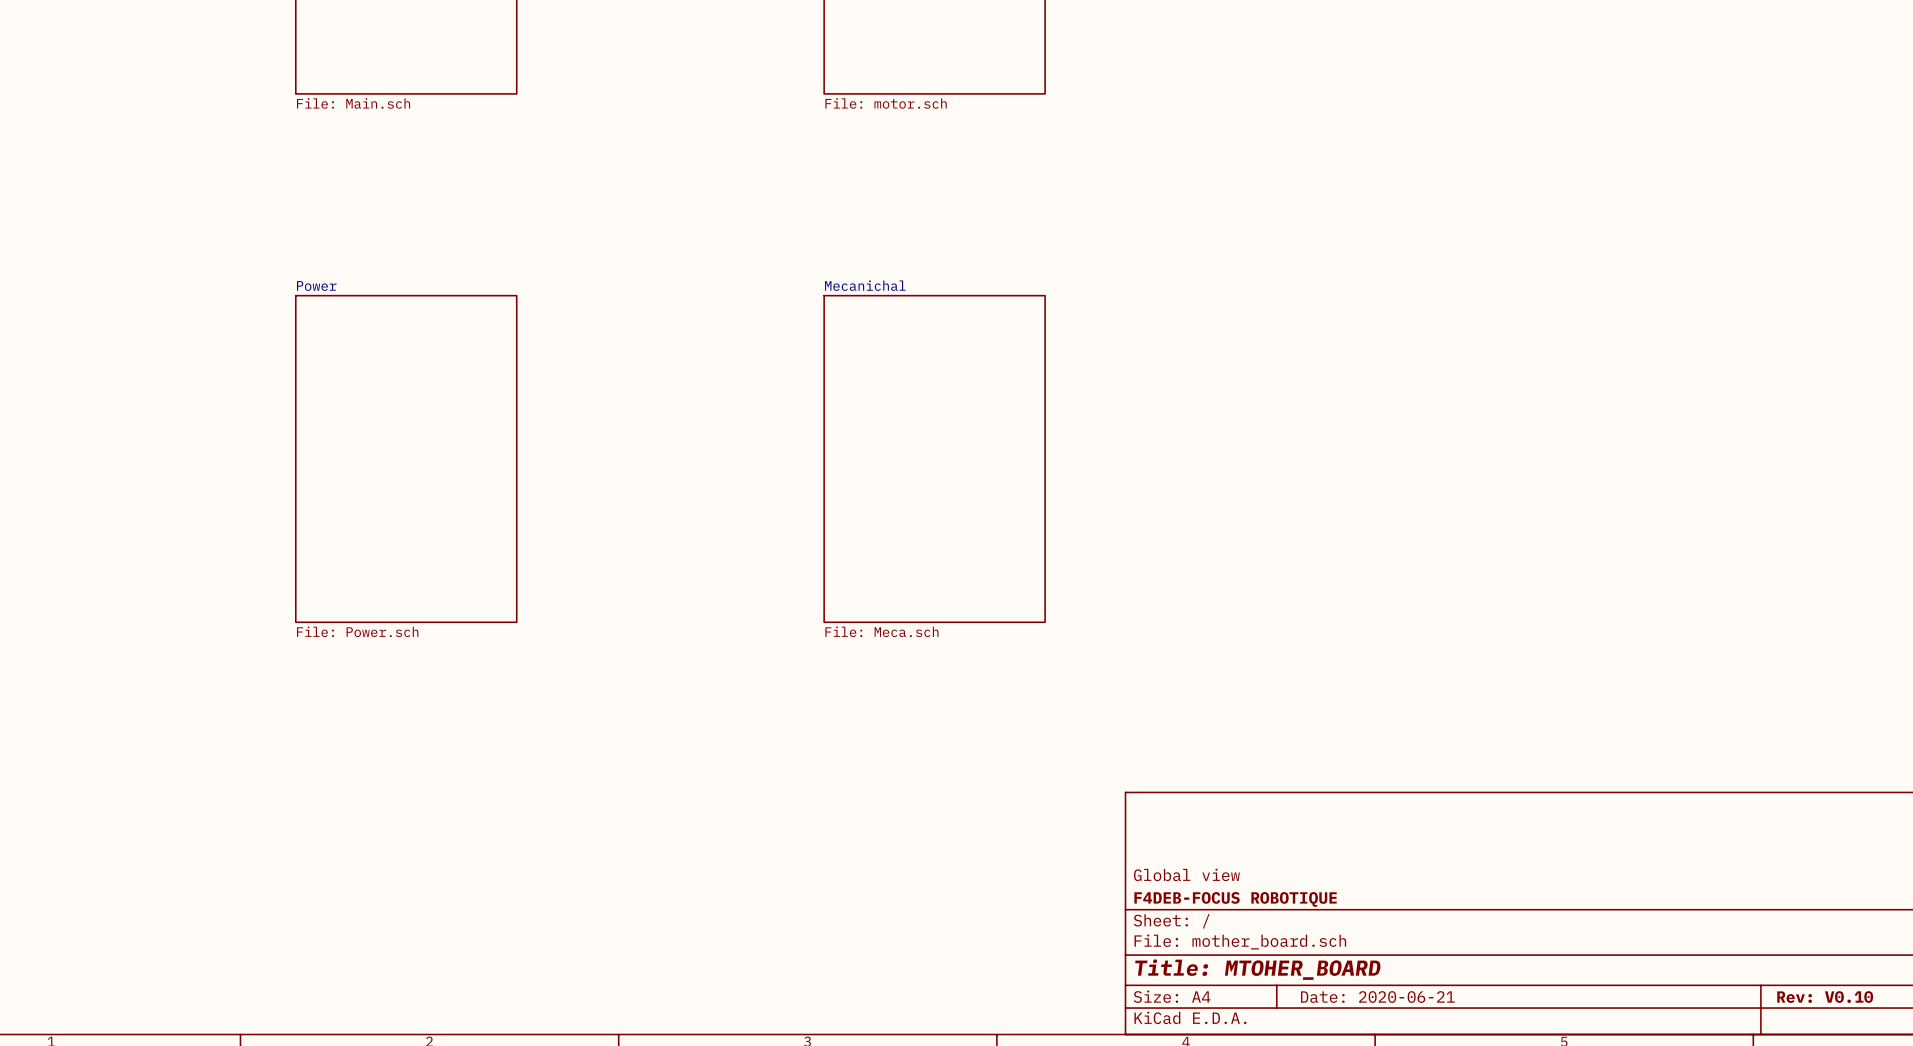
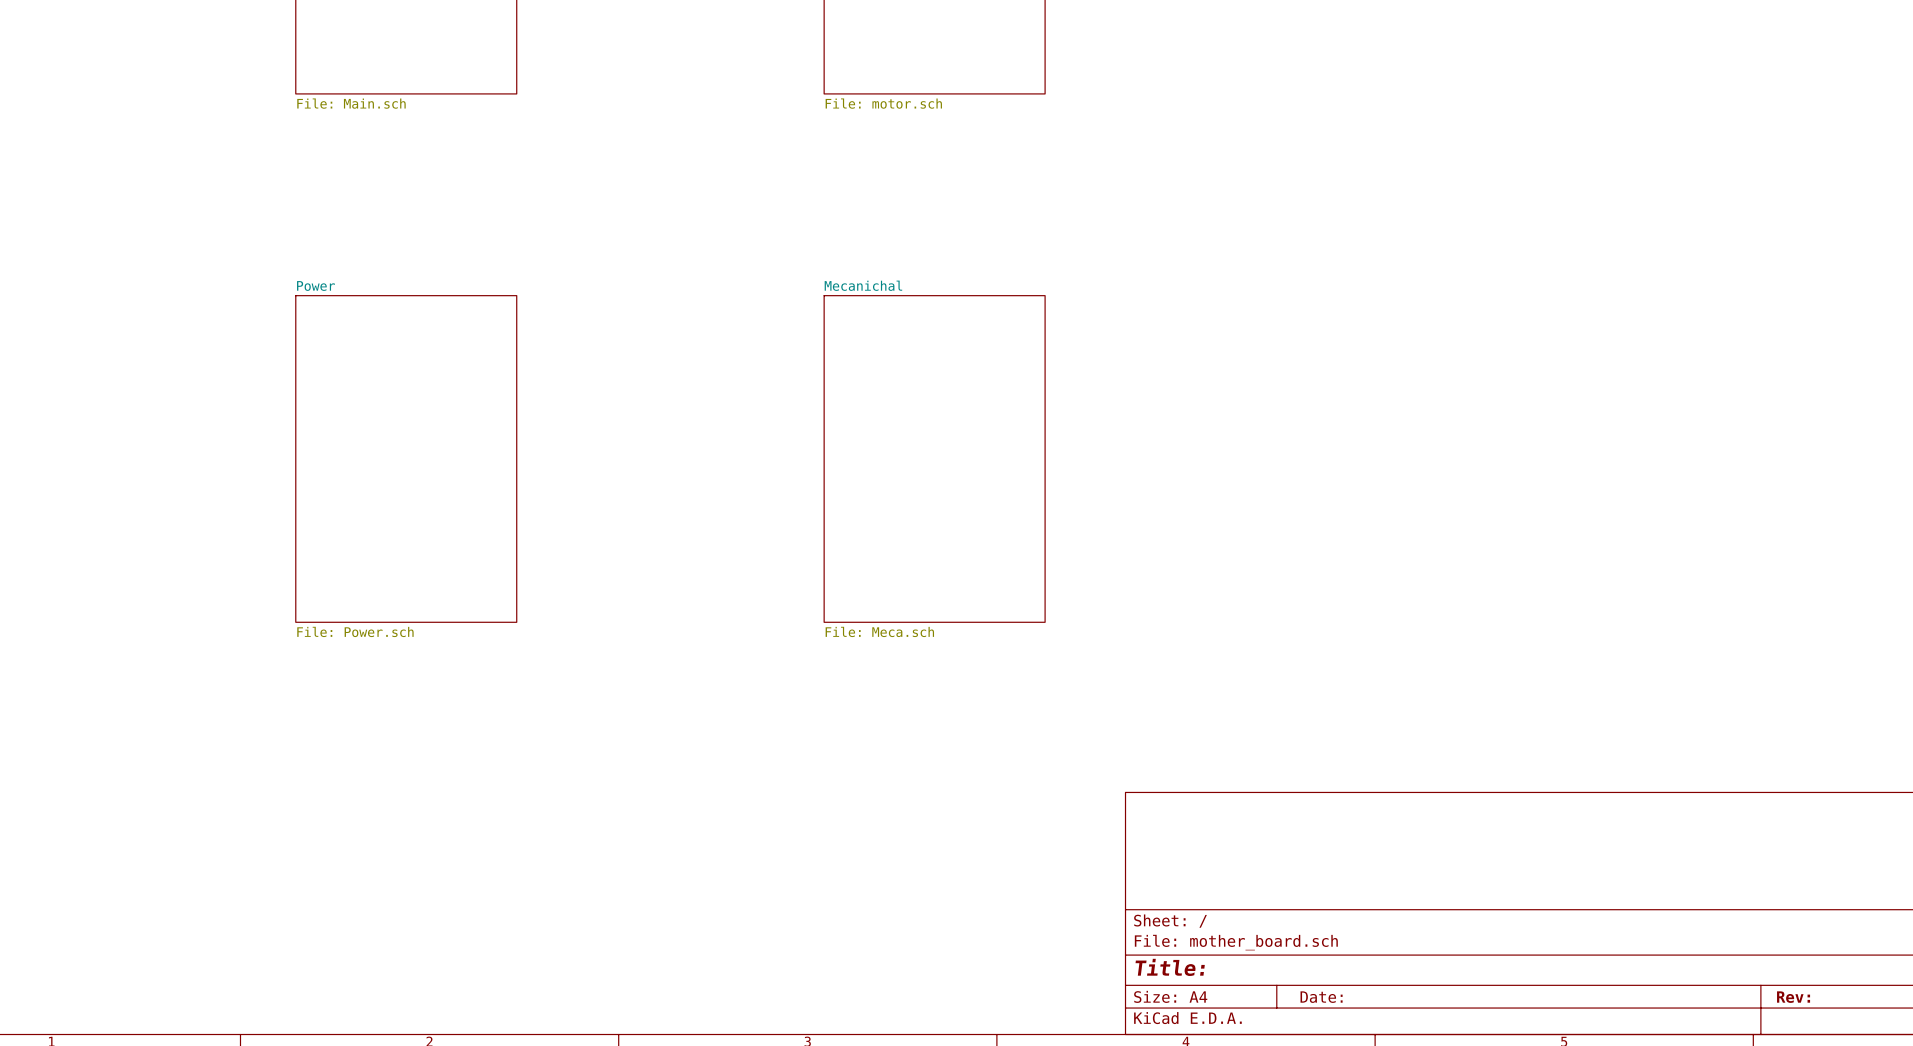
title block: Global view (1186, 874) -> none
title block: F4DEB-FOCUS ROBOTIQUE (1235, 899) -> none
title block: Title: MTOHER_BOARD (1257, 969) -> Title: (1170, 967)
title block: Date: 2020-06-21 (1377, 997) -> Date: (1321, 997)
title block: Rev: V0.10 (1825, 997) -> Rev: (1793, 997)

